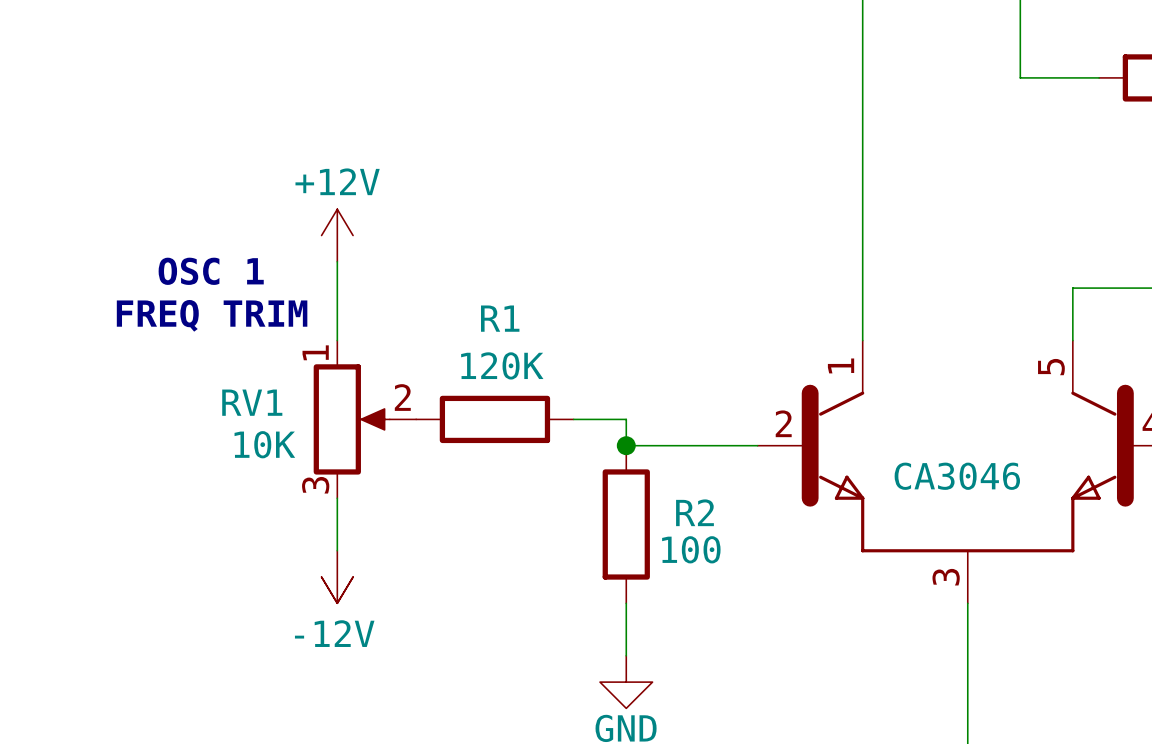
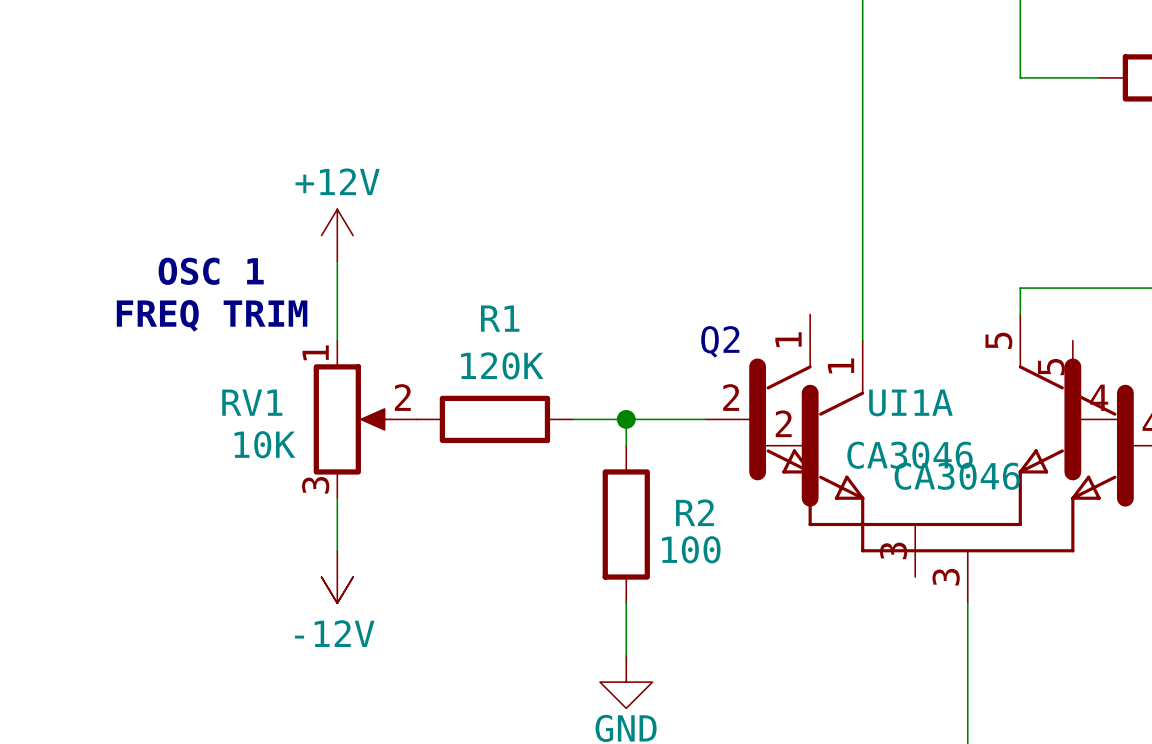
wire: (1072, 288) (1072, 340) -> (1072, 288) (1020, 288) (1020, 314)
text: none -> Q2 (720, 341)
wire: none -> (626, 419) (705, 419)
wire: (626, 445) (757, 445) -> none
junction position: (626, 445) -> (626, 419)
UI1A: none -> CA3046 (915, 445)

